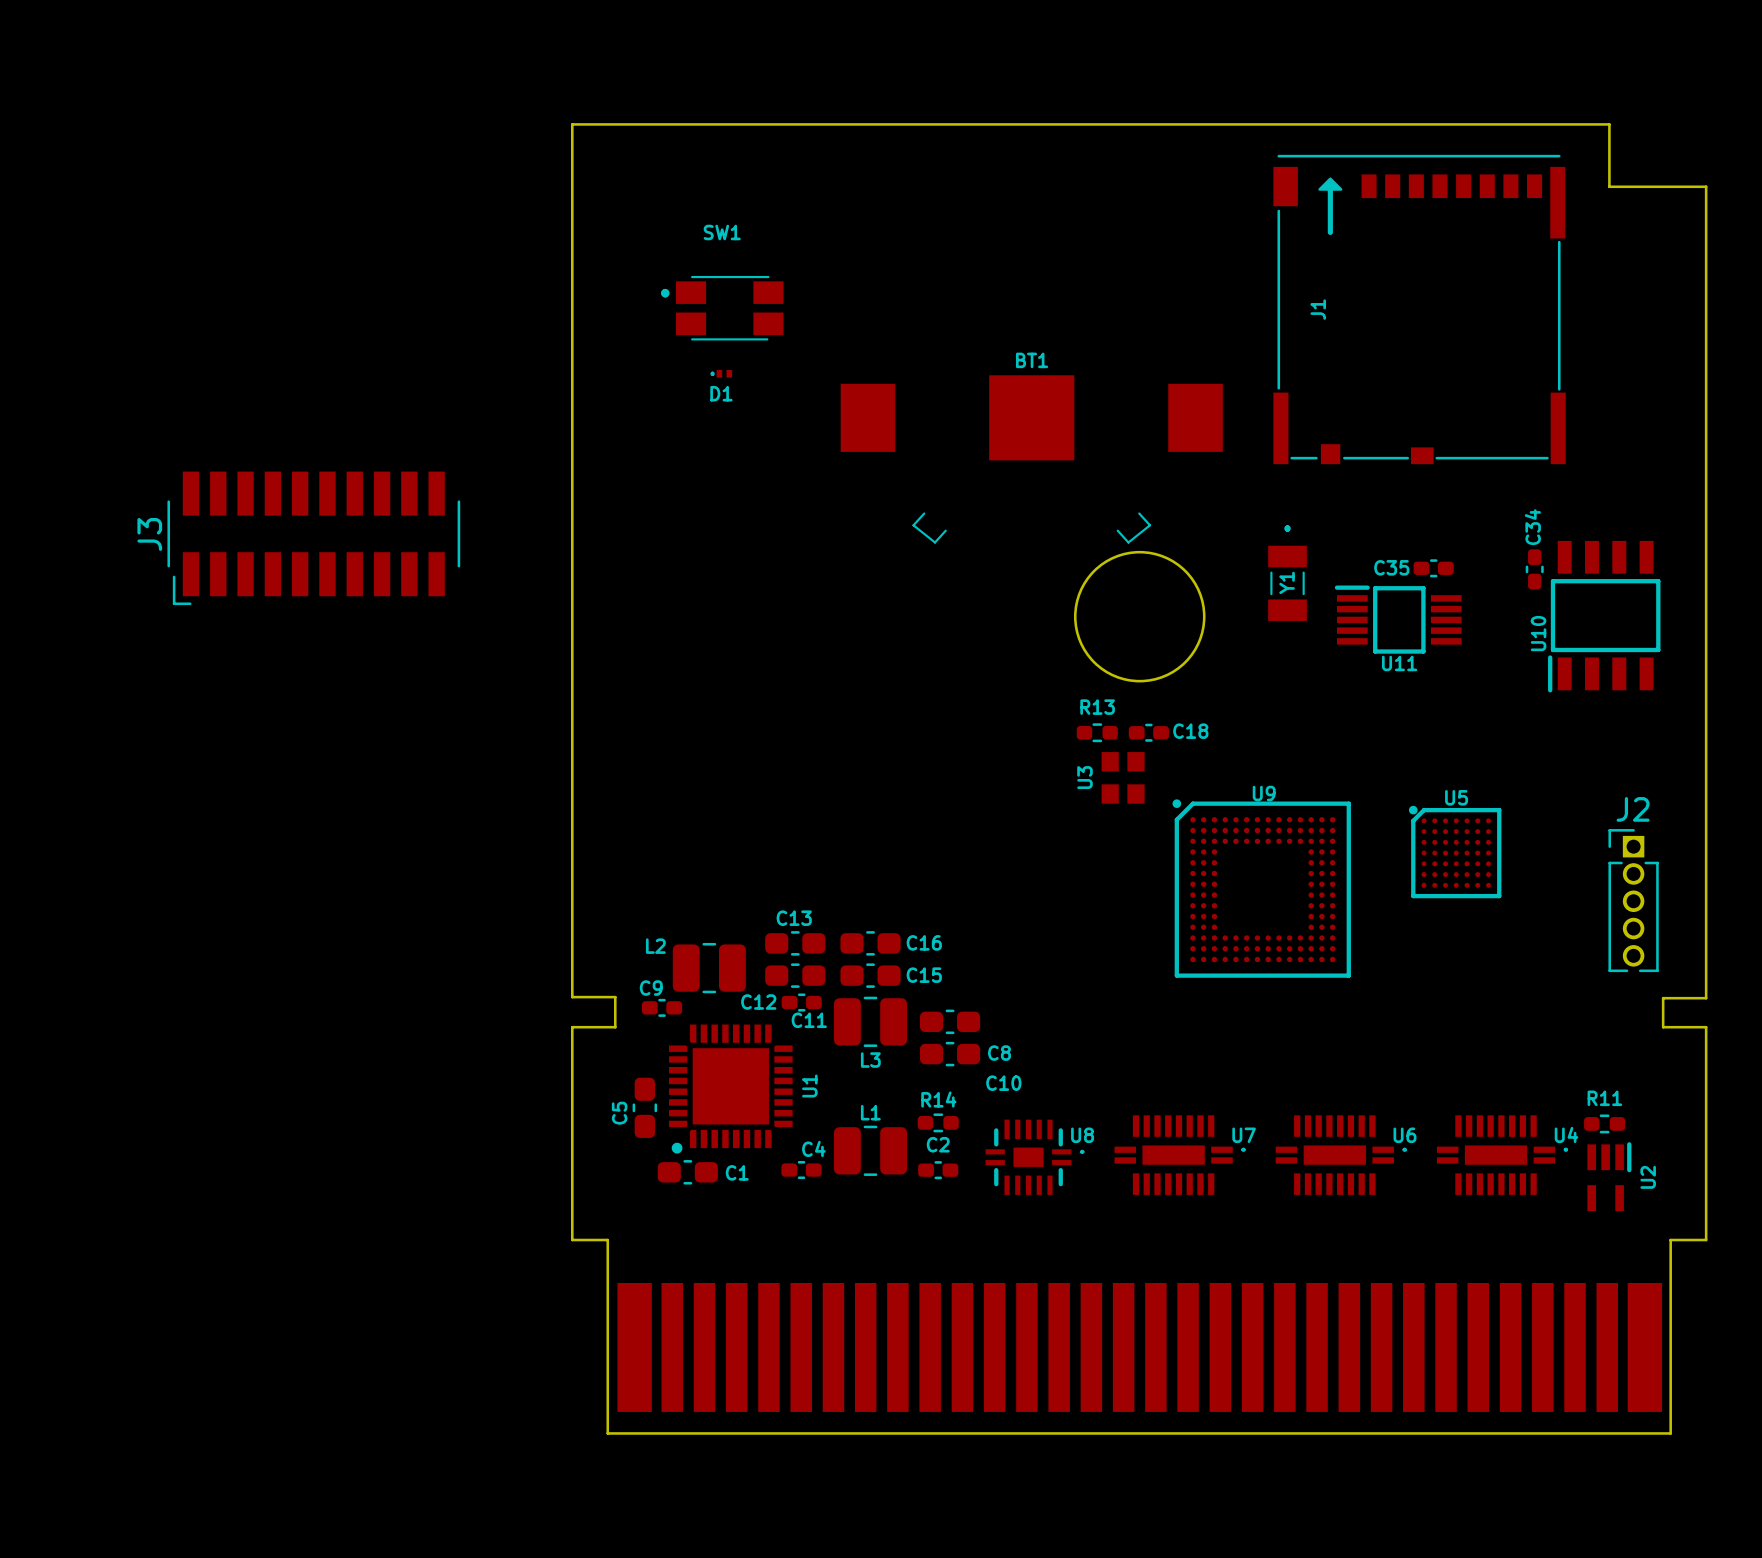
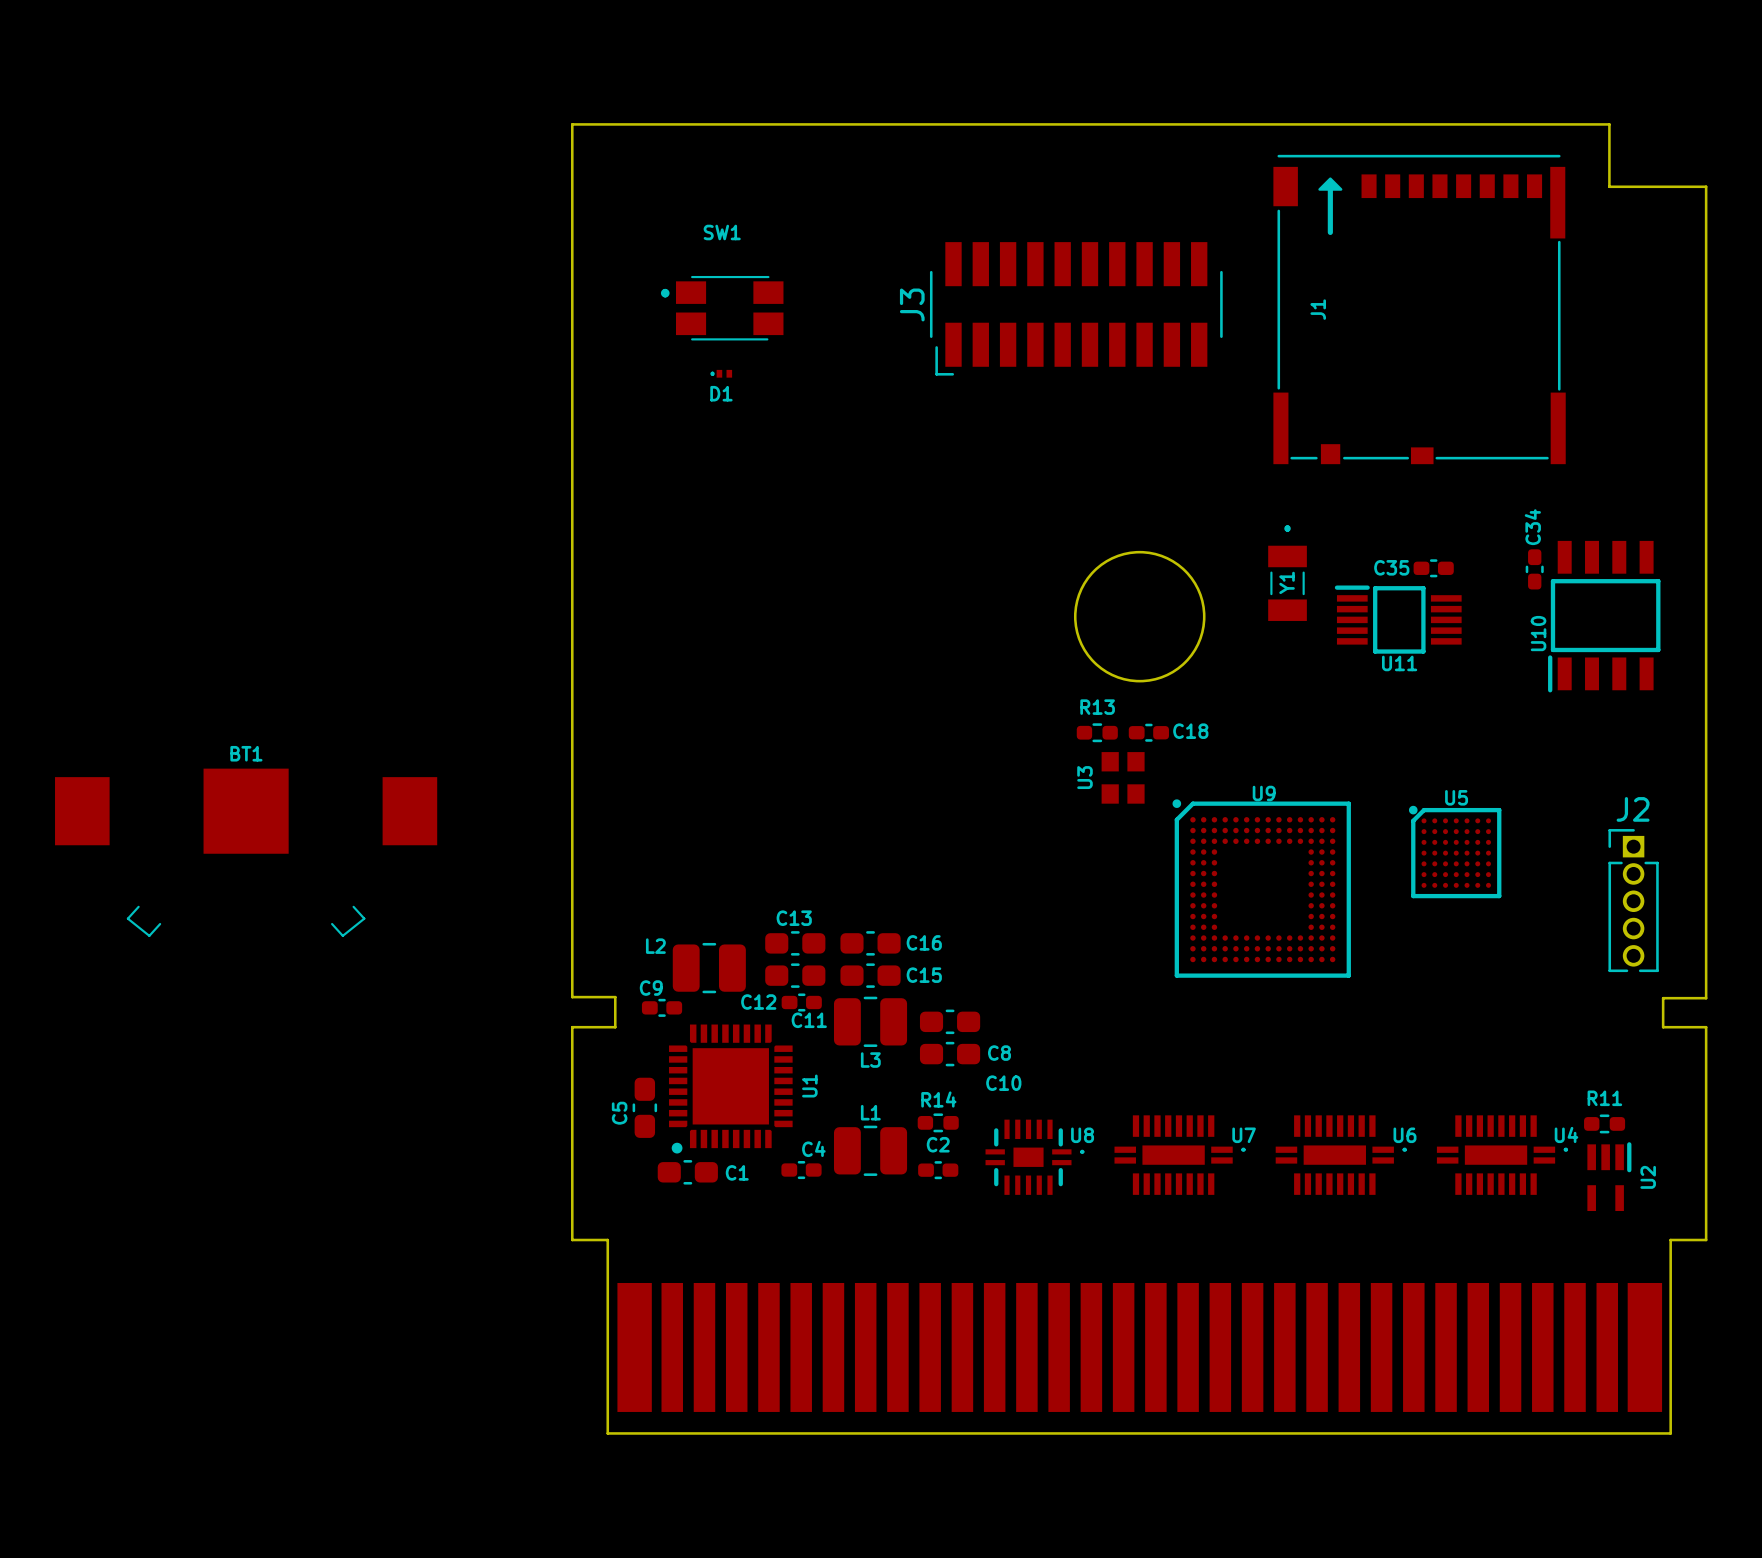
BT1 position: (1031, 459) -> (246, 852)
J3 position: (313, 538) -> (1076, 308)

